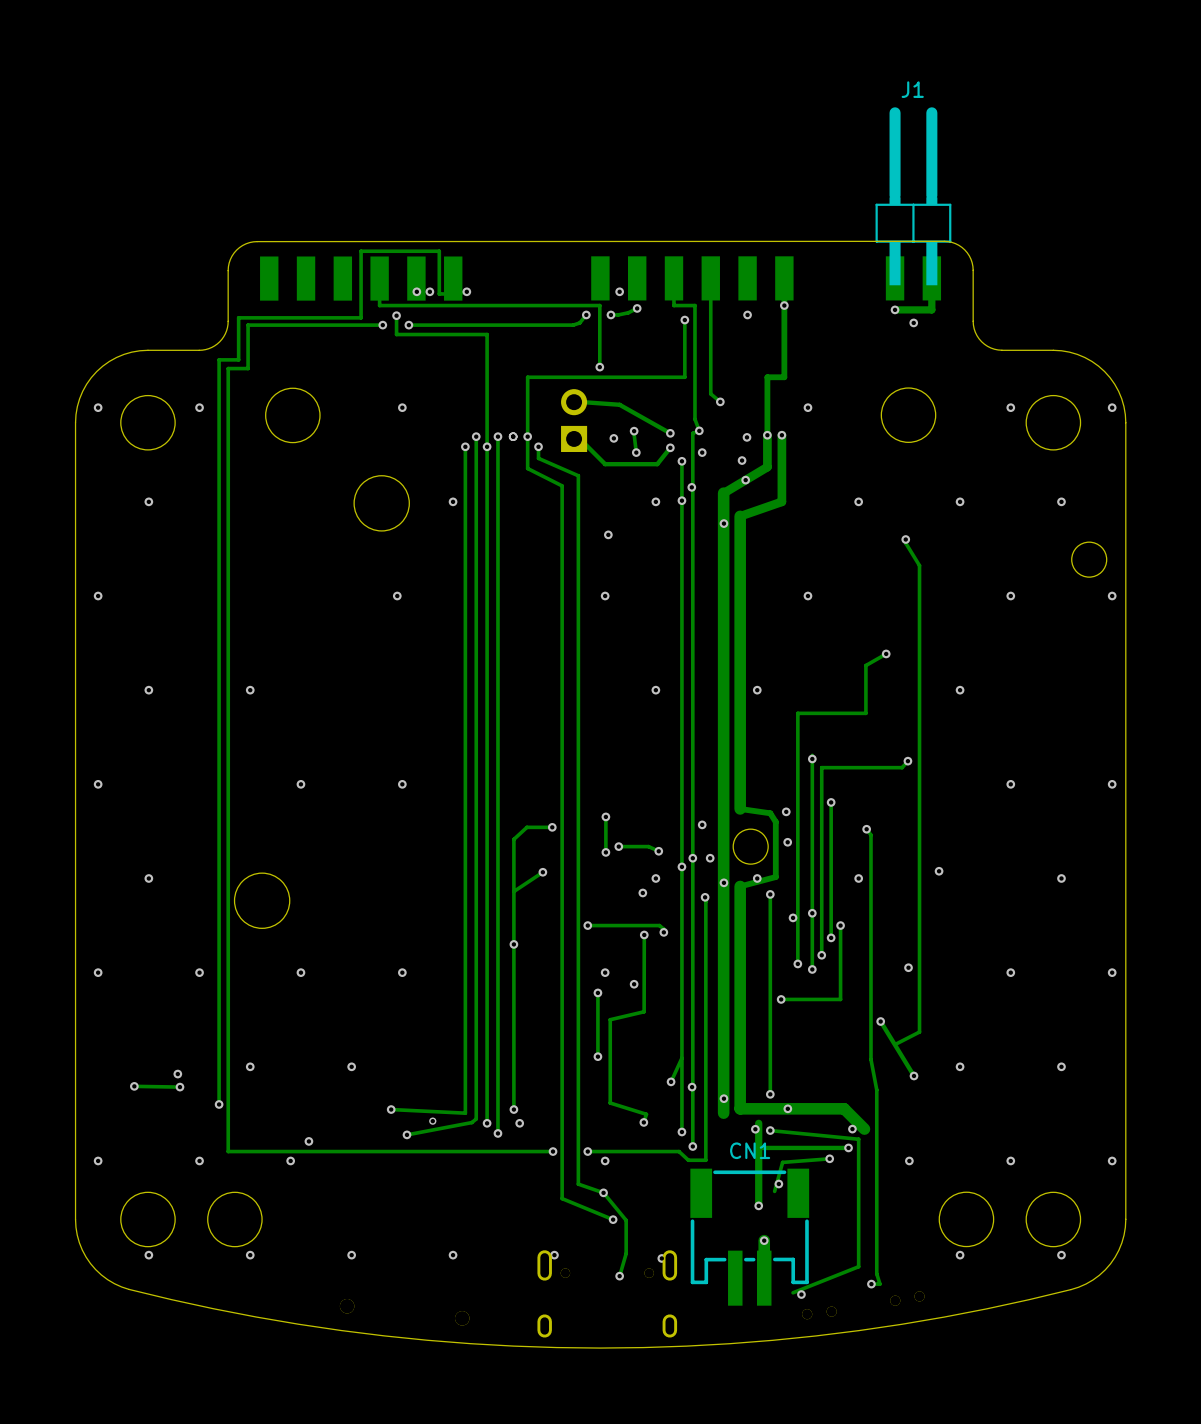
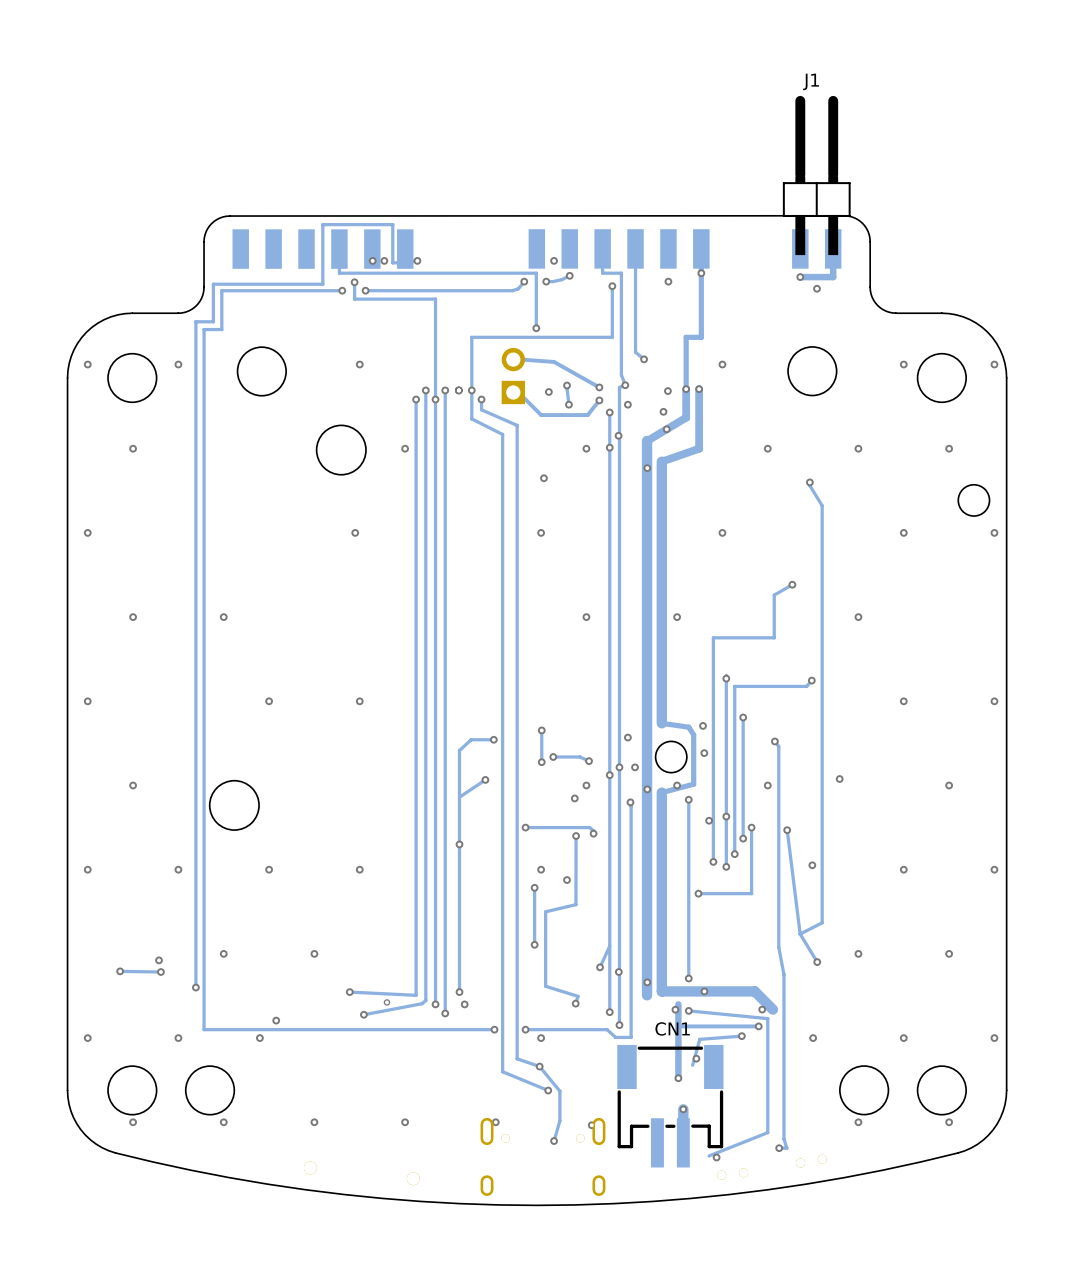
via: none -> (787, 830)
track: (880, 1021) (914, 1075) -> (787, 830) (800, 934) (817, 962)
via: (880, 1021) -> none

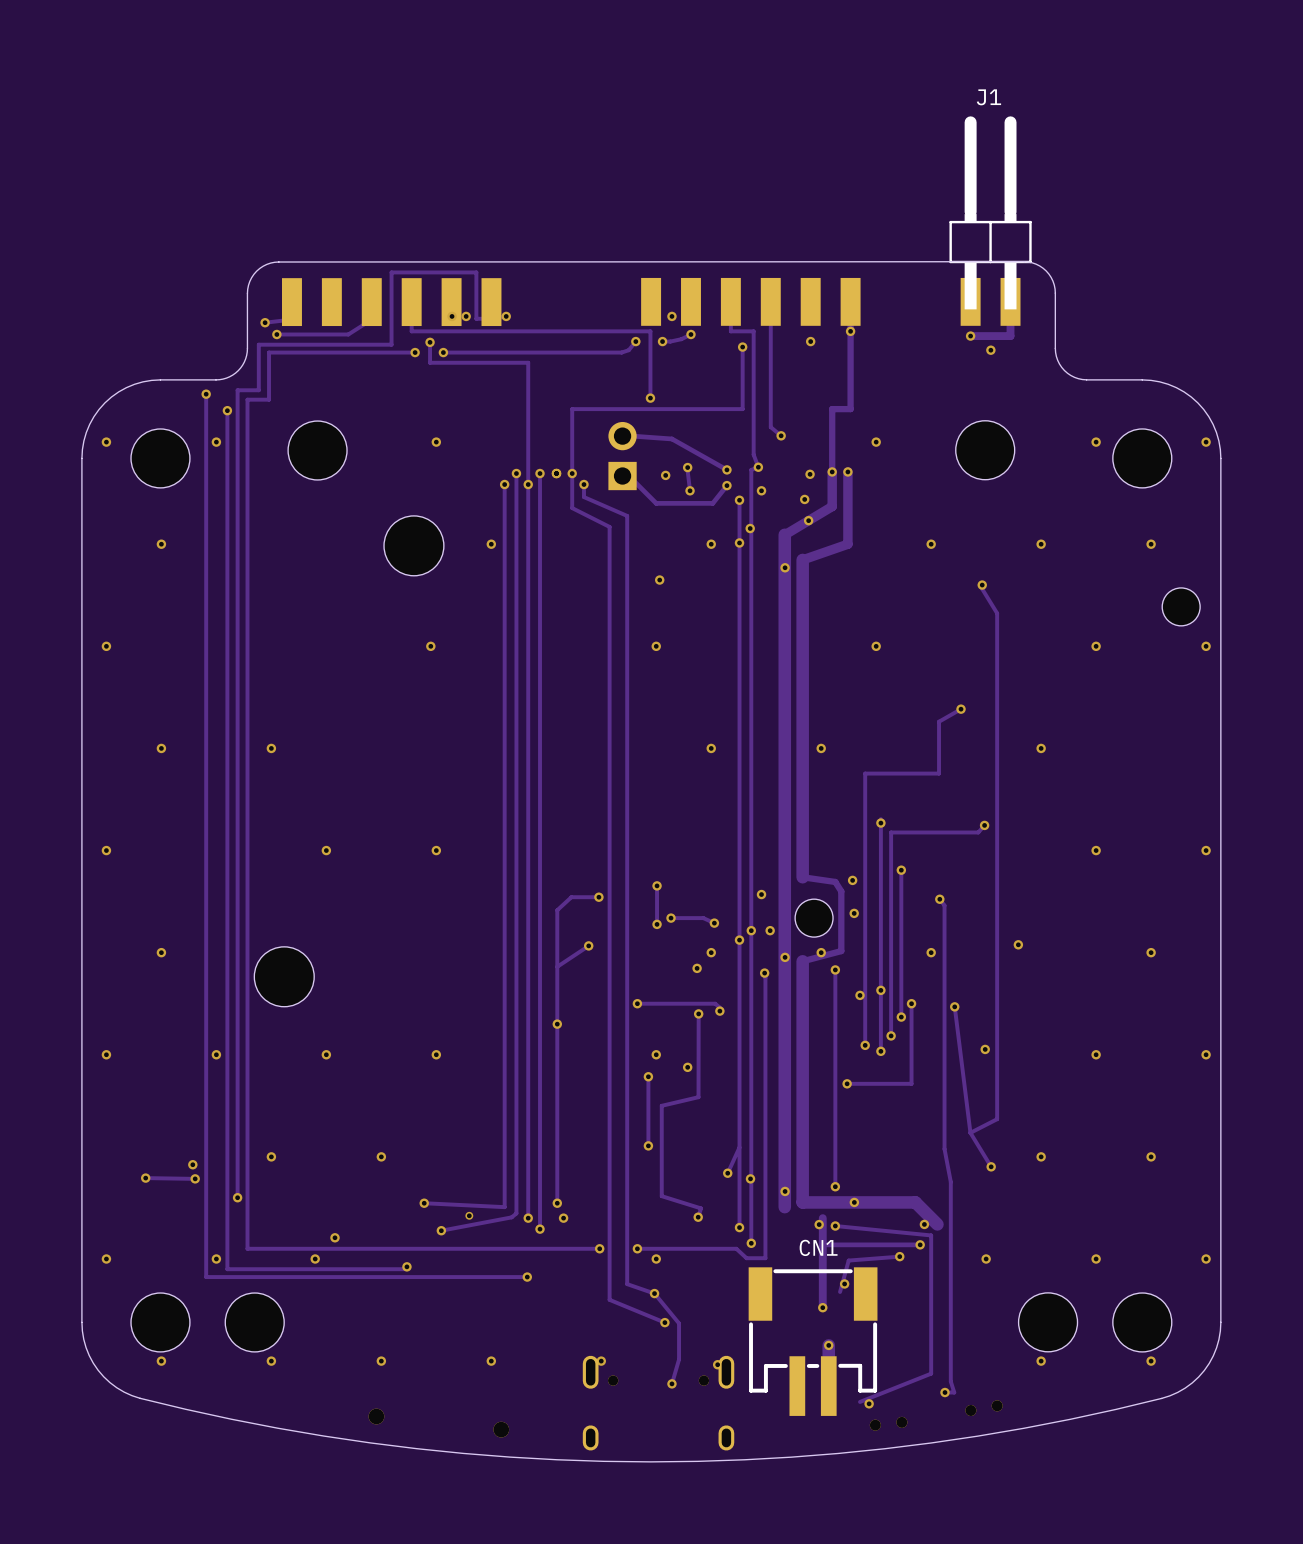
track: none -> (291, 319) (265, 322)
track: none -> (371, 319) (348, 334) (276, 334)
via: none -> (265, 322)
via: none -> (276, 334)
track: none -> (206, 394) (206, 1277) (527, 1277)
via: none -> (206, 394)
track: none -> (227, 410) (227, 1269) (406, 1269) (406, 1266)
via: none -> (227, 410)
via: none -> (406, 1266)
via: none -> (527, 1277)

